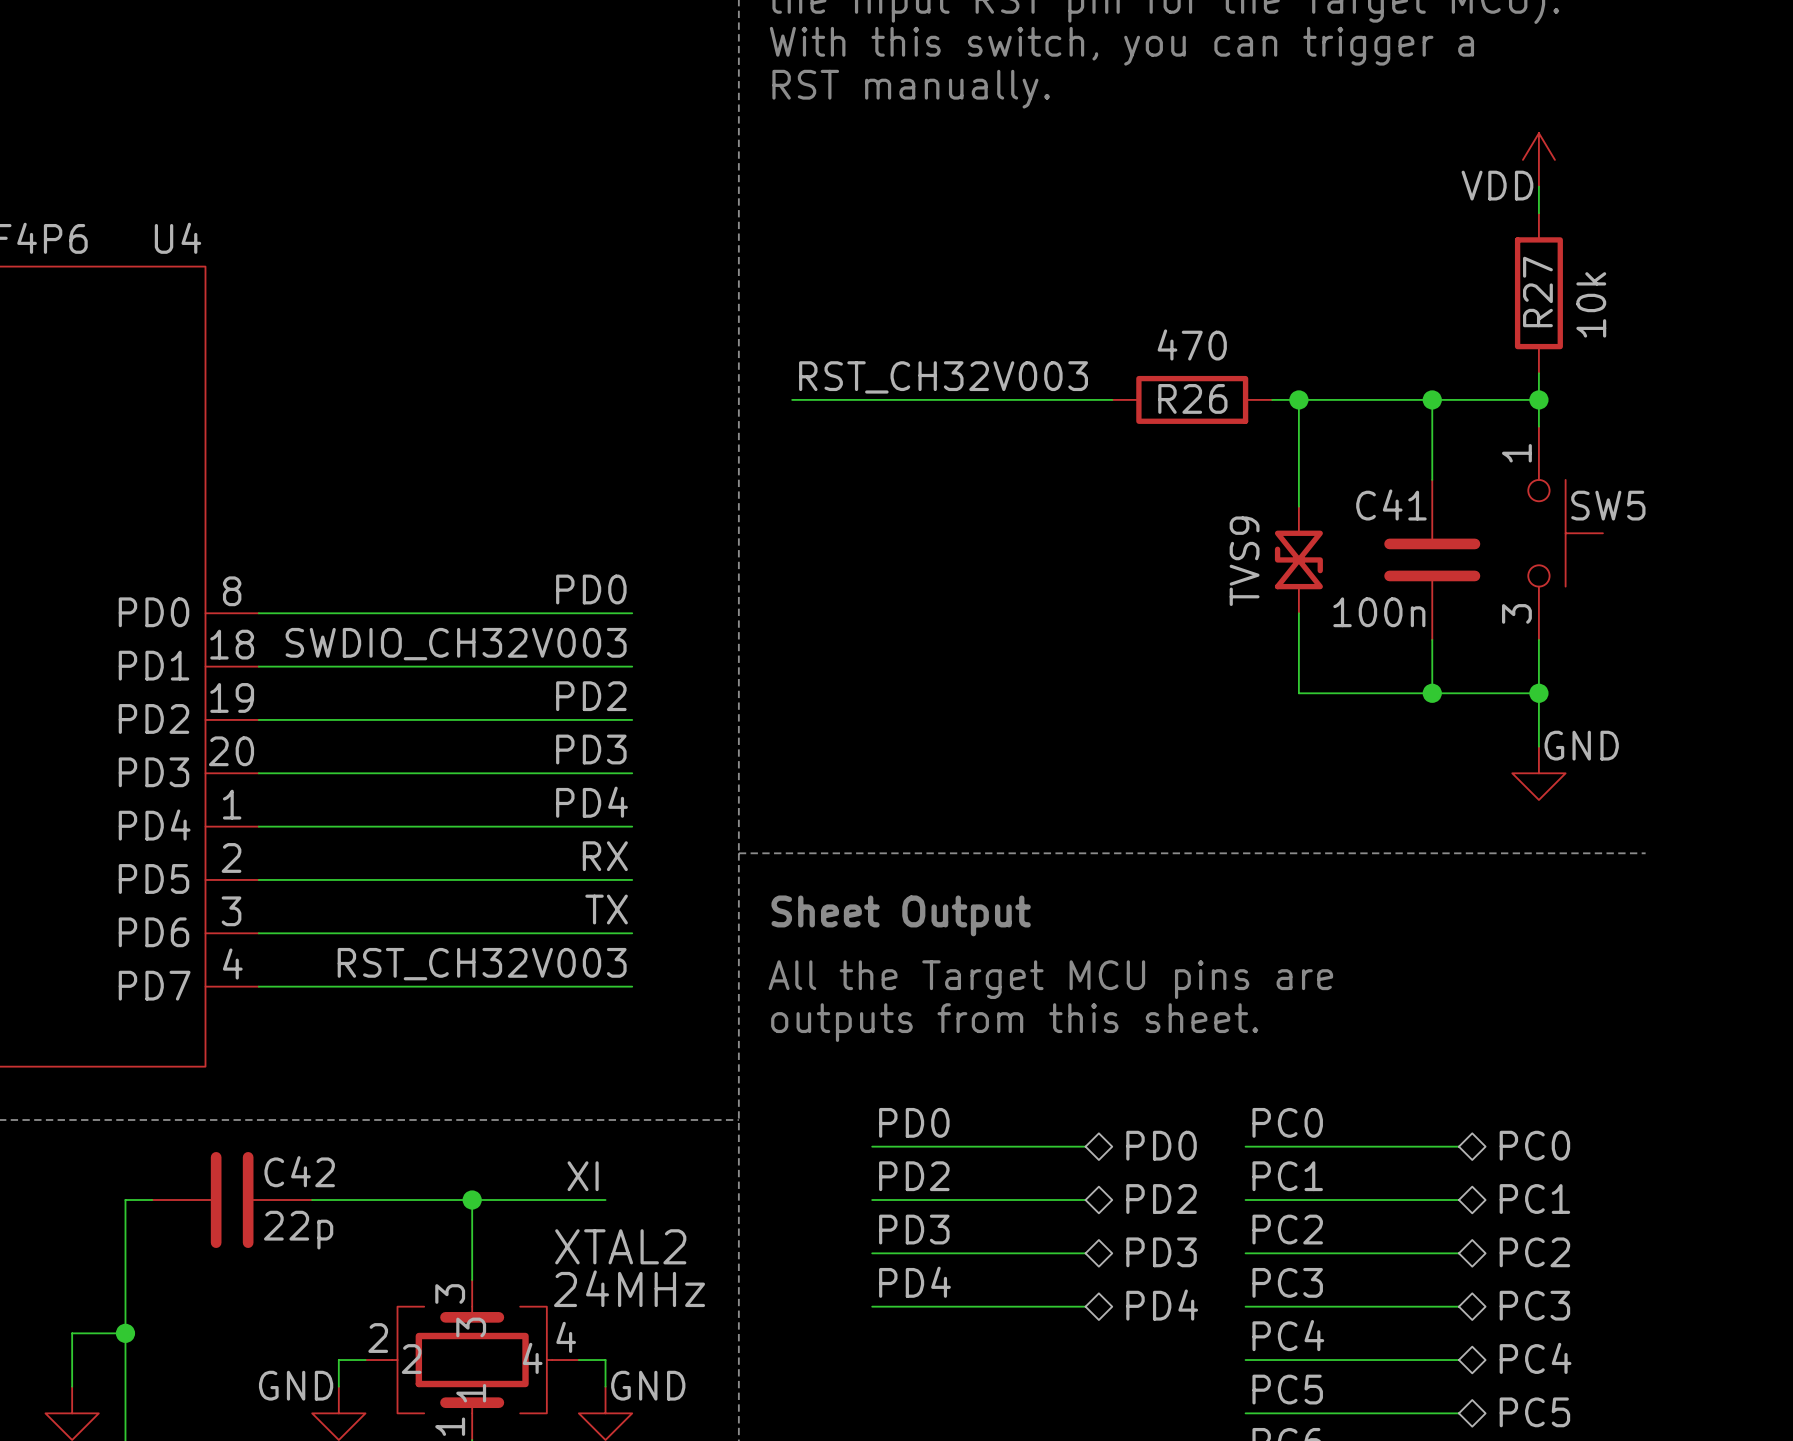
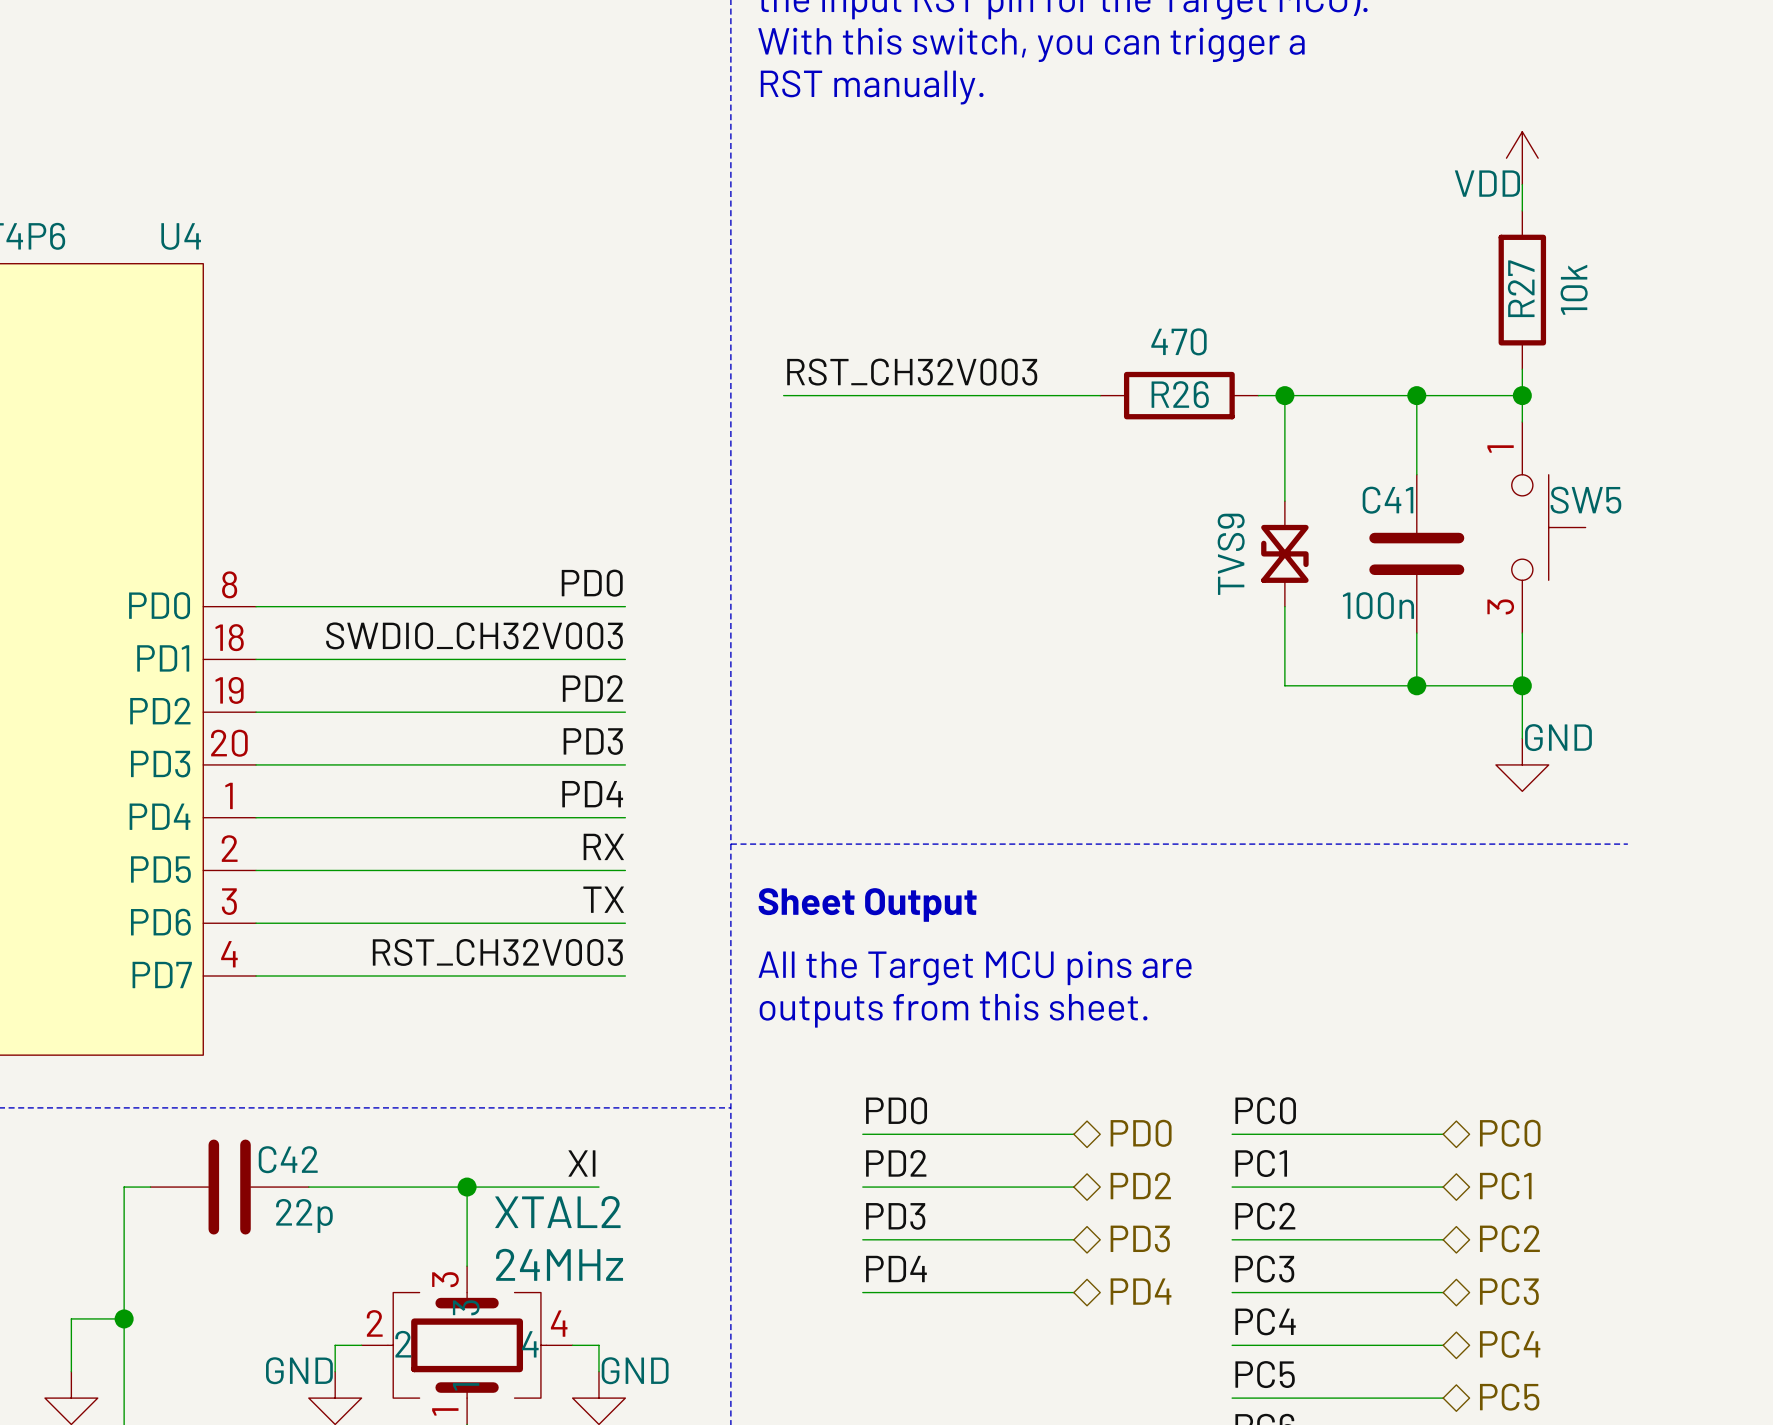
XTAL2 name position: XTAL2 (620, 1246) -> XTAL2 (557, 1212)
XTAL2 value position: 24MHz (629, 1288) -> 24MHz (559, 1264)

